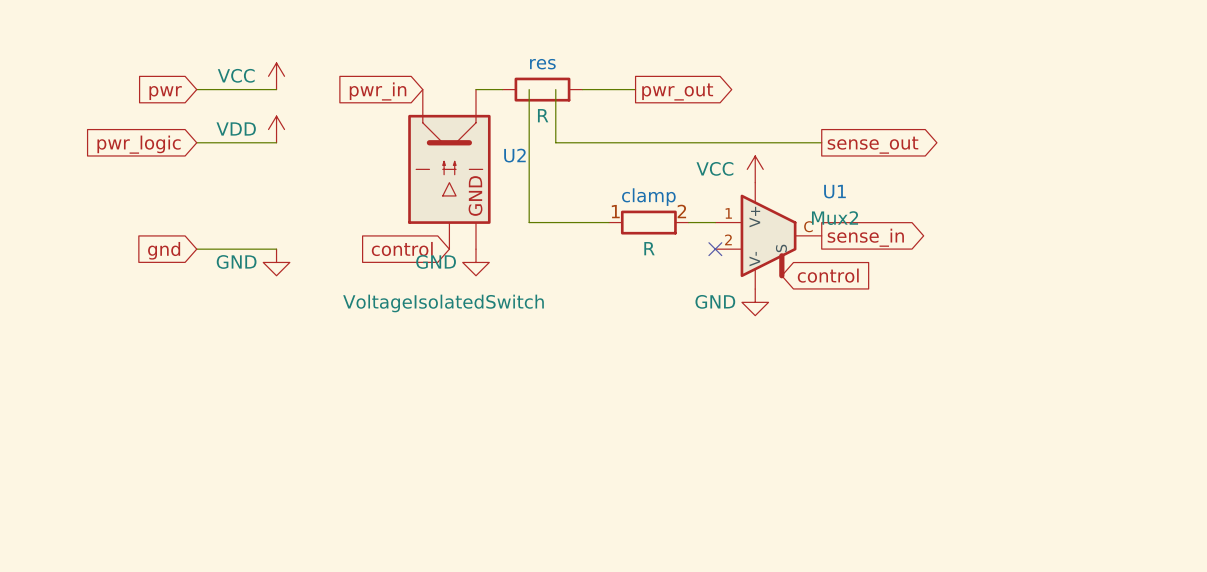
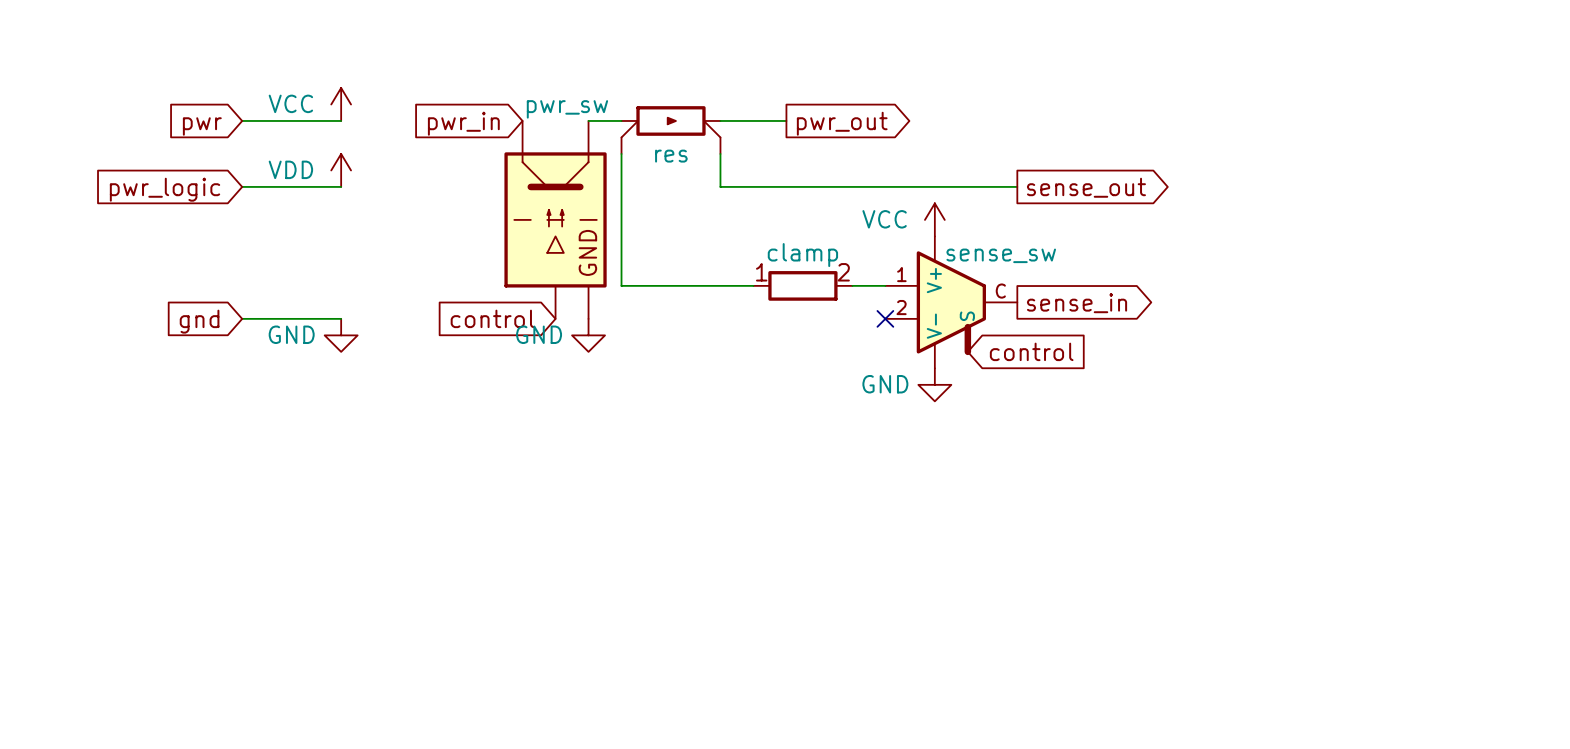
res name position: res (542, 64) -> res (671, 156)
res symbol: [502, 77, 583, 102] -> [621, 106, 721, 154]
wire: (529, 89) (529, 222) -> (621, 153) (621, 285) (654, 285)
wire: (555, 89) (555, 142) (582, 142) -> (720, 153) (720, 186)
res value: R (543, 115) -> none
U2 name: U2 (514, 155) -> pwr_sw (567, 109)
U1 name: U1 (834, 191) -> sense_sw (1001, 255)
U1 value: Mux2 (835, 218) -> none
clamp value: R (649, 248) -> none
U2 value: VoltageIsolatedSwitch (443, 303) -> none

